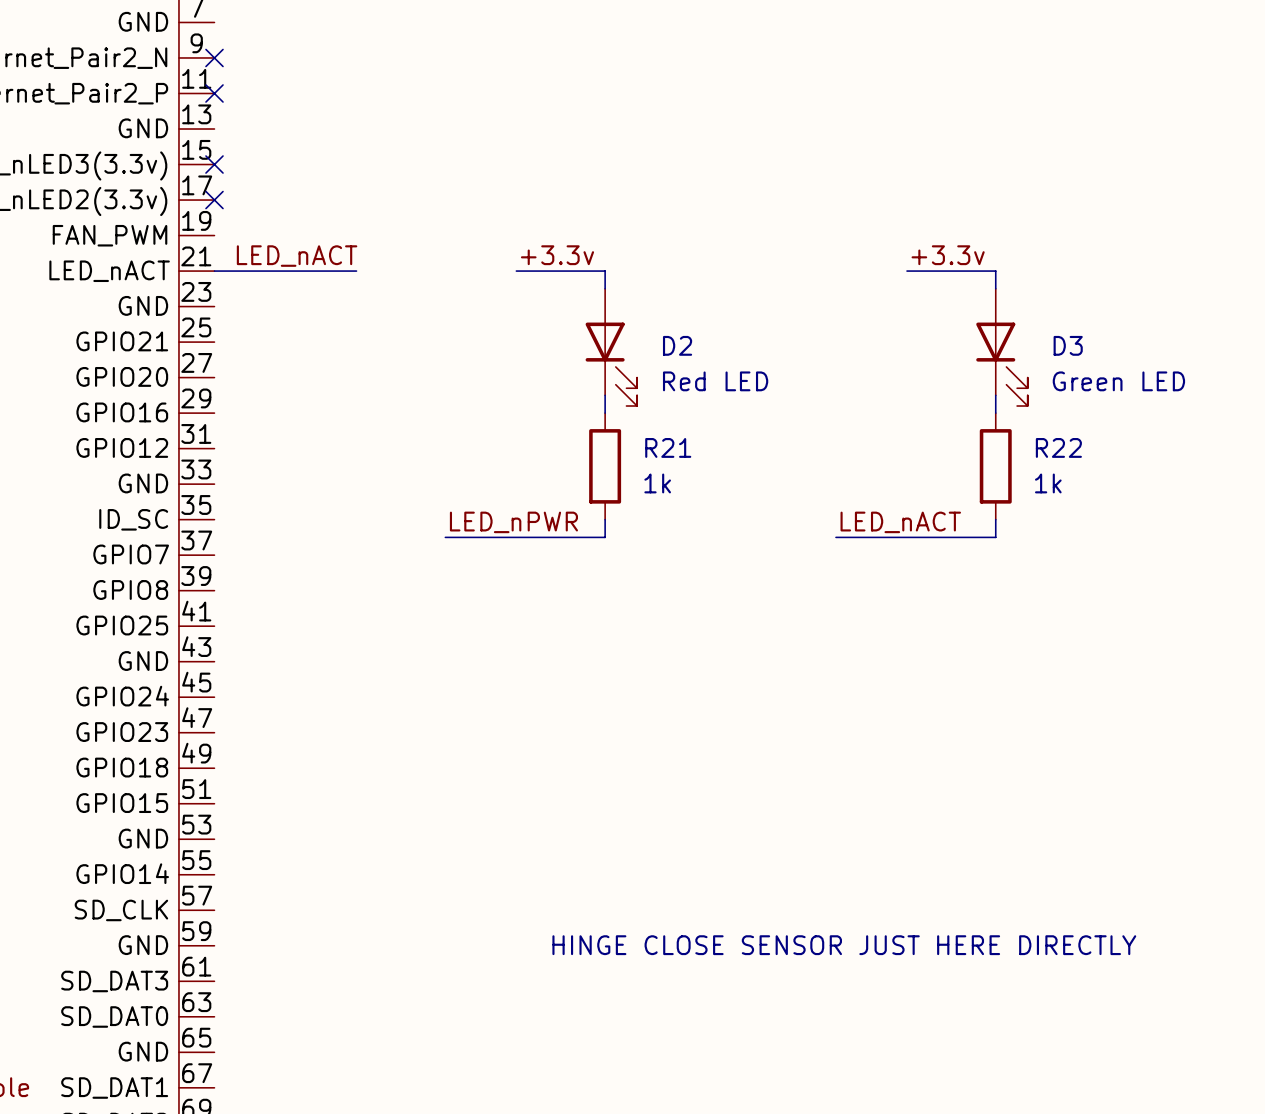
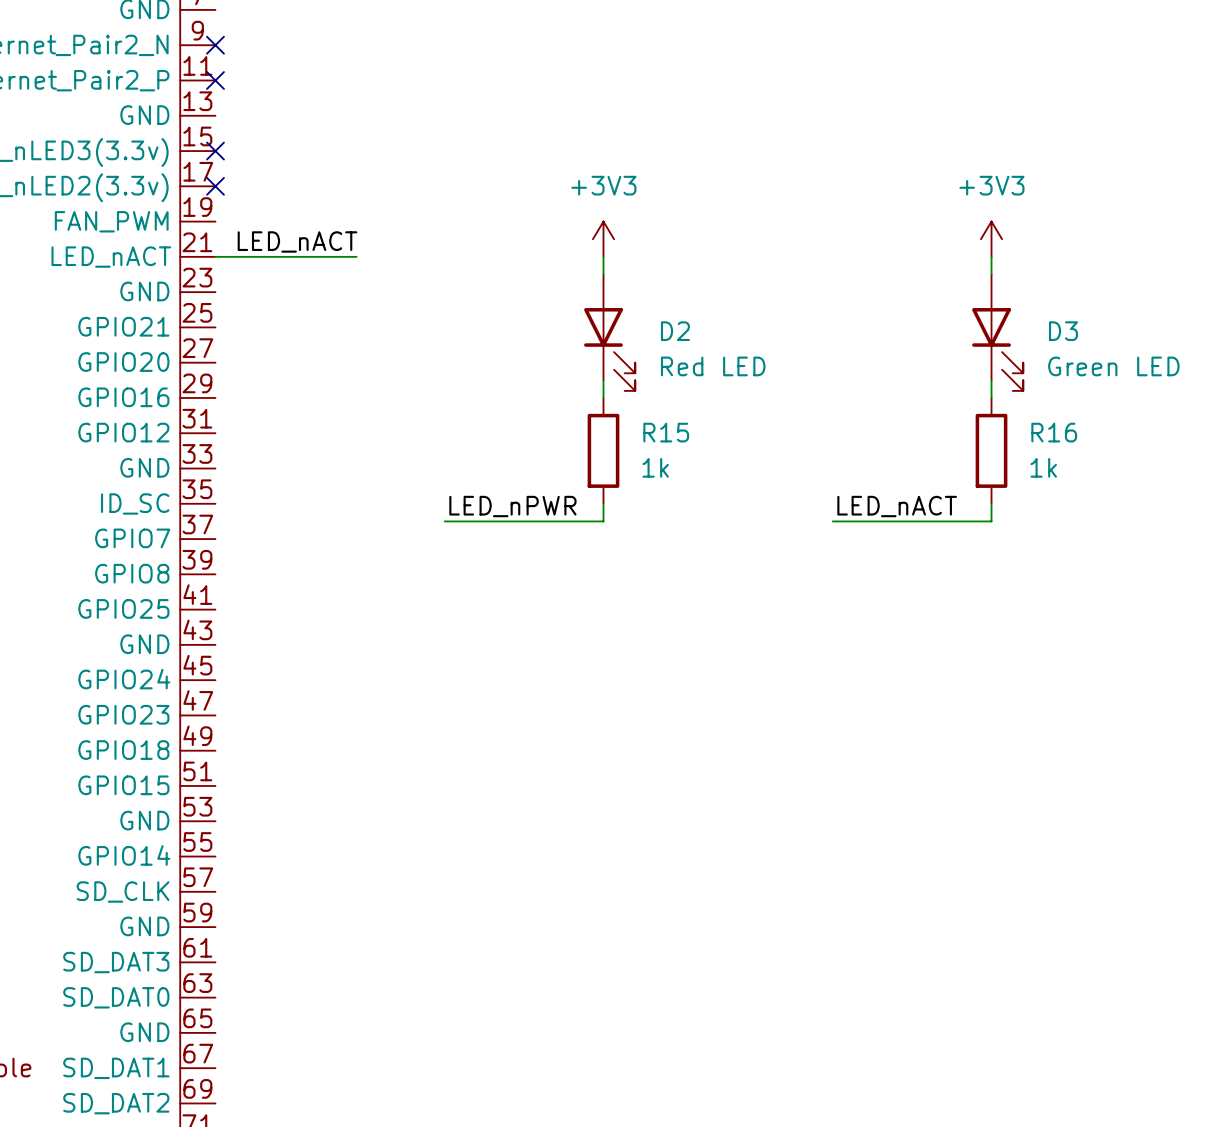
power symbol: none -> +3V3 (603, 239)
power symbol: none -> +3V3 (991, 239)
label: +3.3v (557, 255) -> none
label: +3.3v (948, 255) -> none
wire: (516, 271) (605, 271) -> none
wire: (906, 271) (995, 271) -> none
R21 name: R21 (668, 447) -> R15 (666, 432)
R22 name: R22 (1058, 447) -> R16 (1054, 432)
text: HINGE CLOSE SENSOR JUST HERE DIRECTLY (844, 945) -> none

